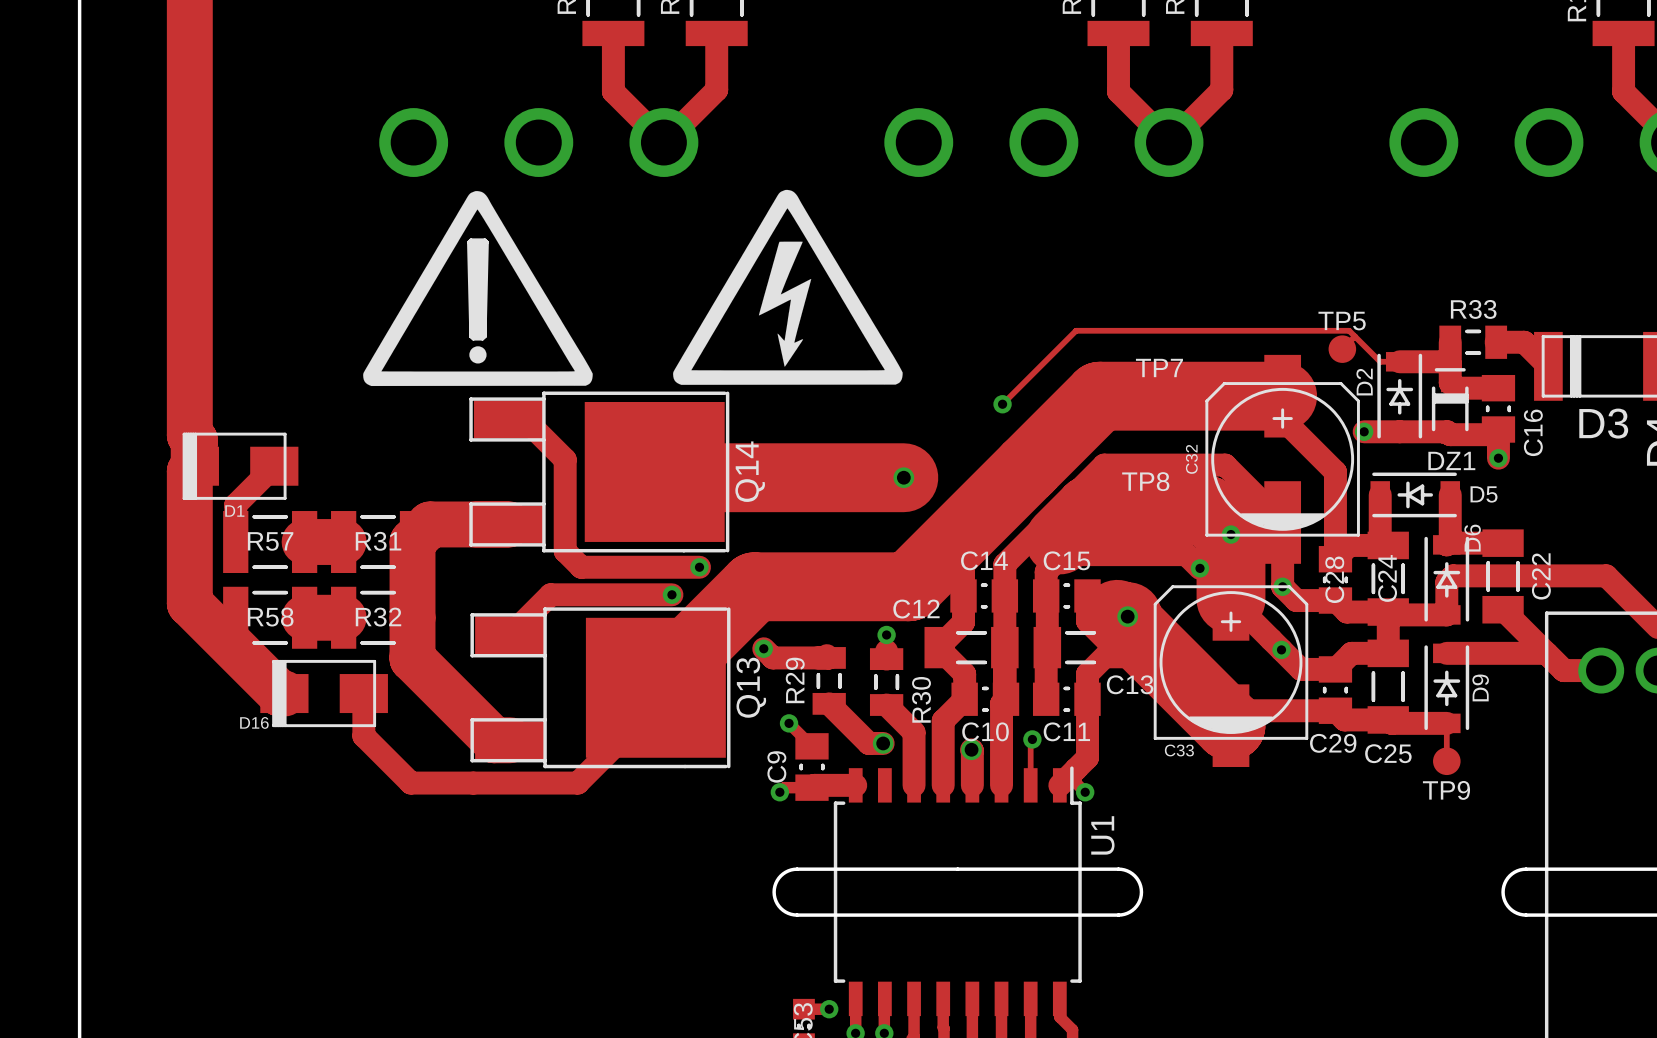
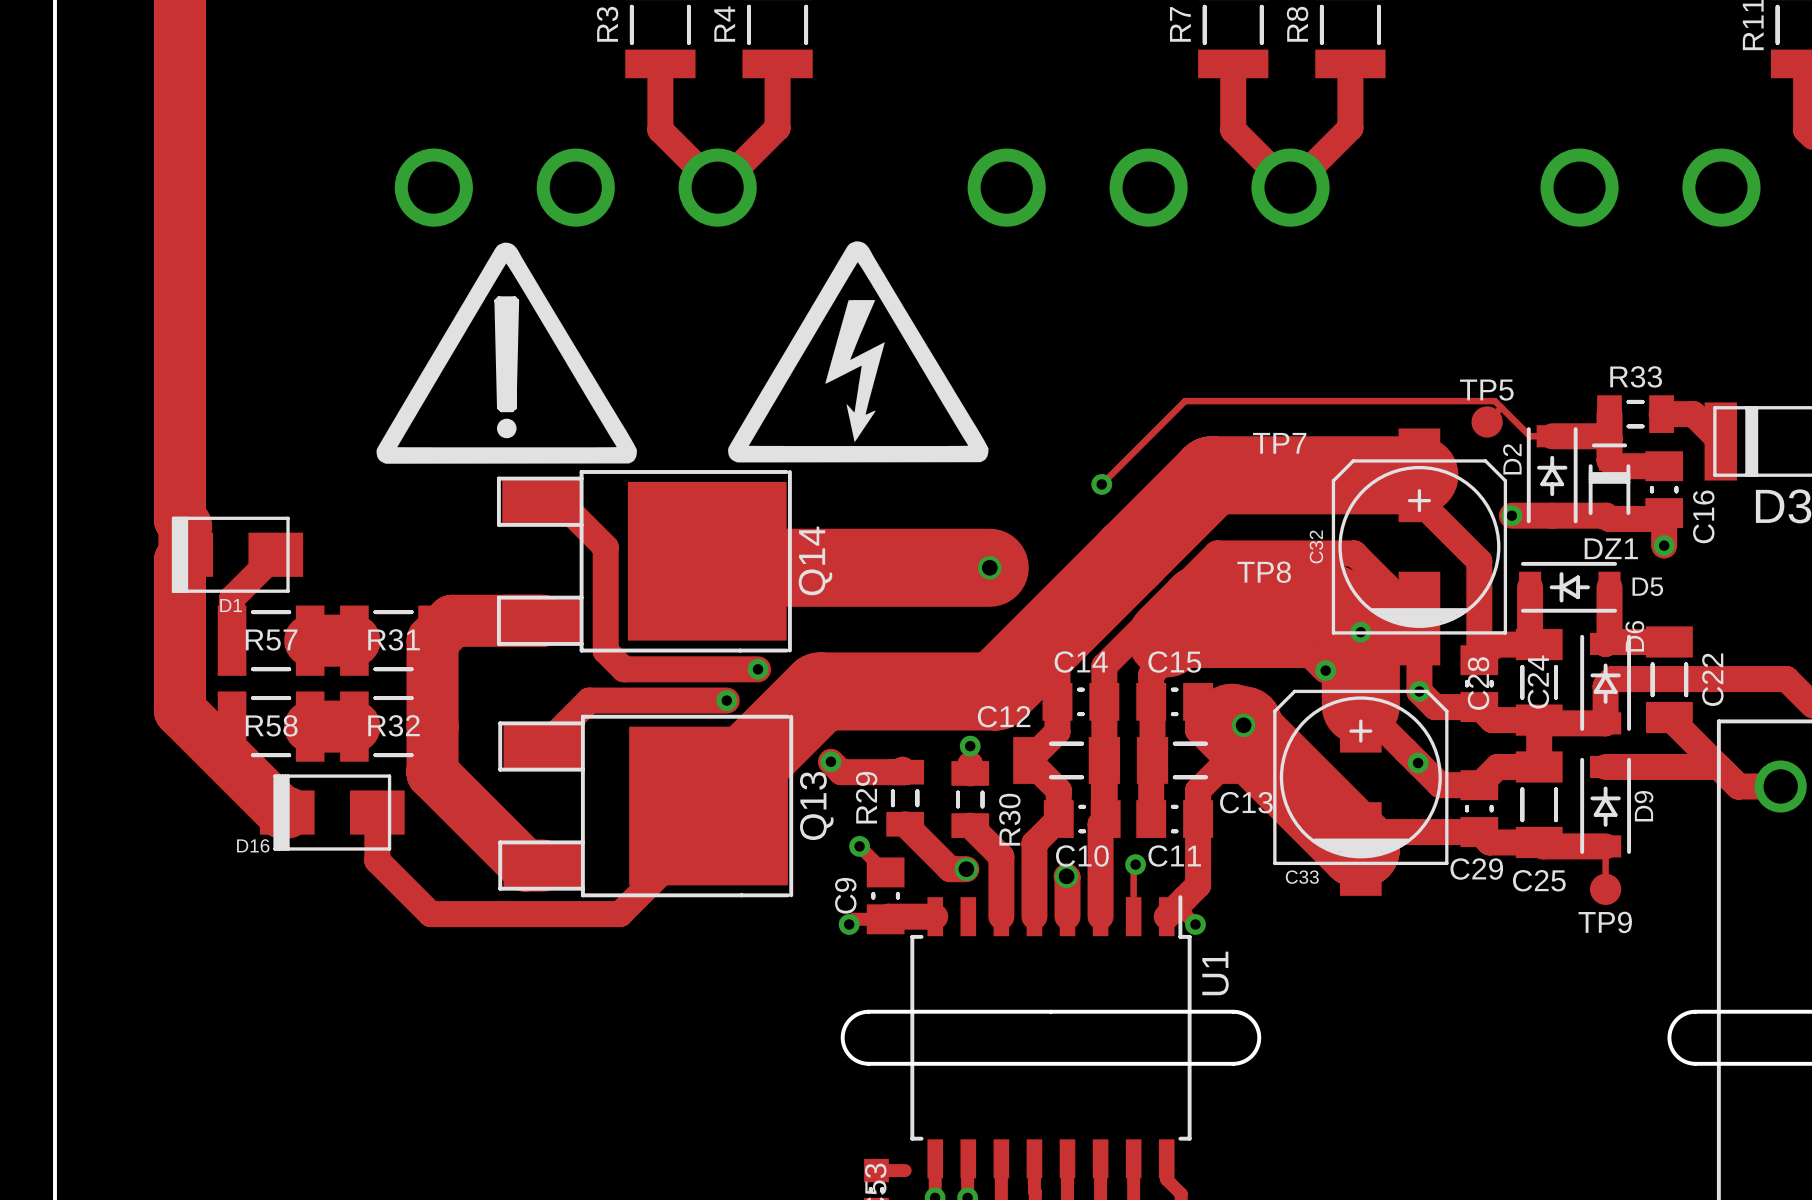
via: (829, 1009) -> none

